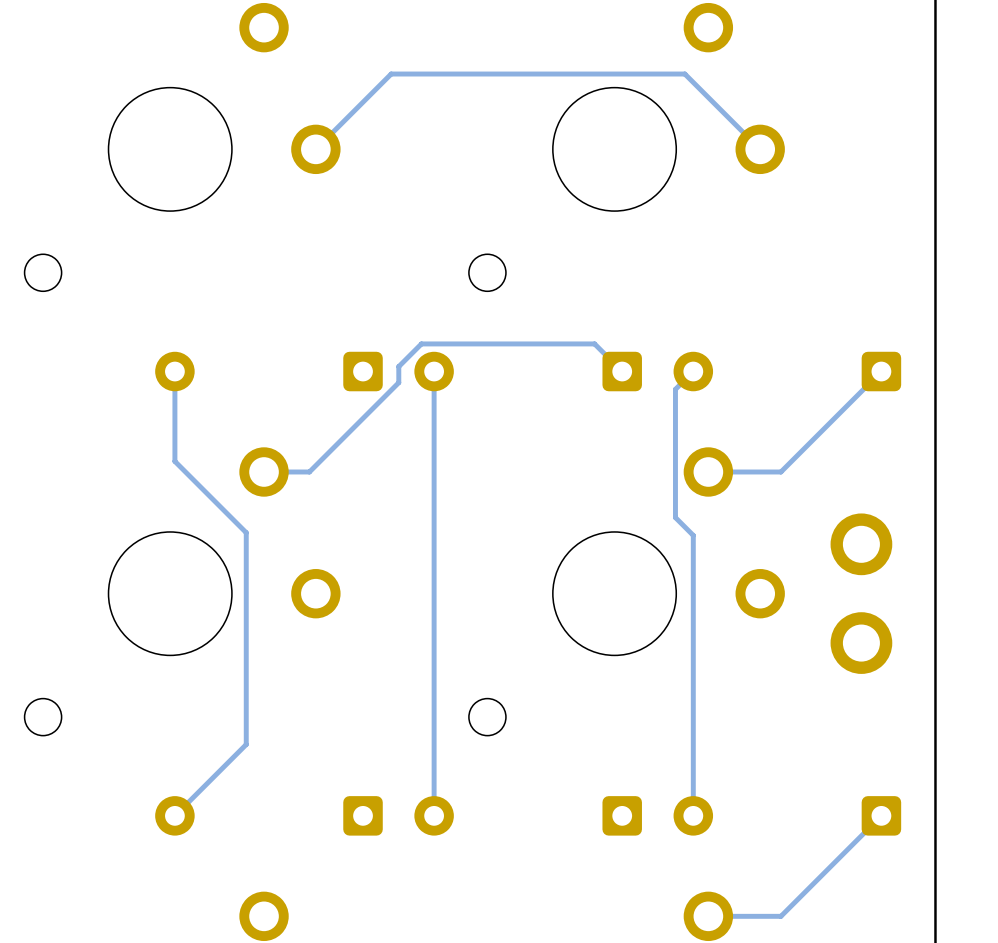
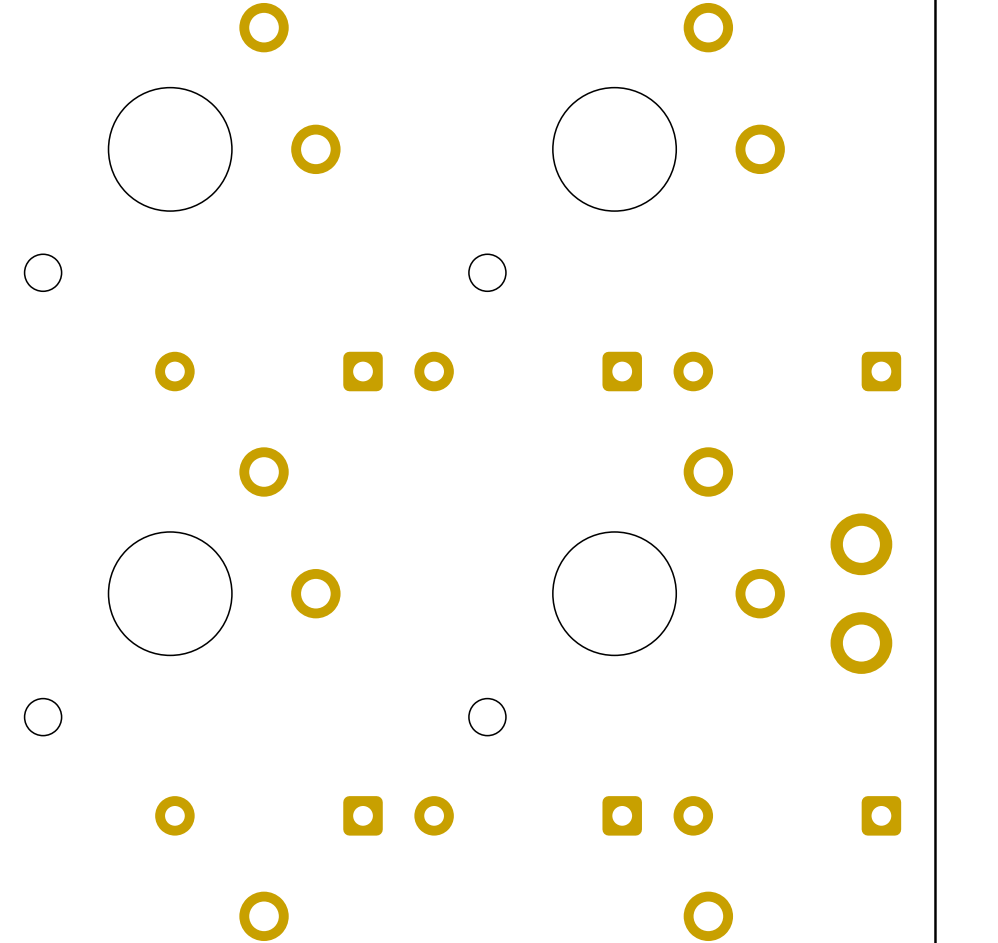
track: (760, 149) (684, 74) (391, 74) (315, 149) -> none
track: (174, 371) (174, 461) (246, 532) (246, 744) (174, 815) -> none
track: (434, 371) (434, 815) -> none
track: (622, 371) (594, 343) (421, 343) (398, 366) (398, 382) (309, 471) (264, 471) -> none
track: (693, 371) (675, 389) (675, 517) (693, 535) (693, 815) -> none
track: (881, 371) (780, 471) (708, 471) -> none
track: (881, 815) (780, 916) (708, 916) -> none

